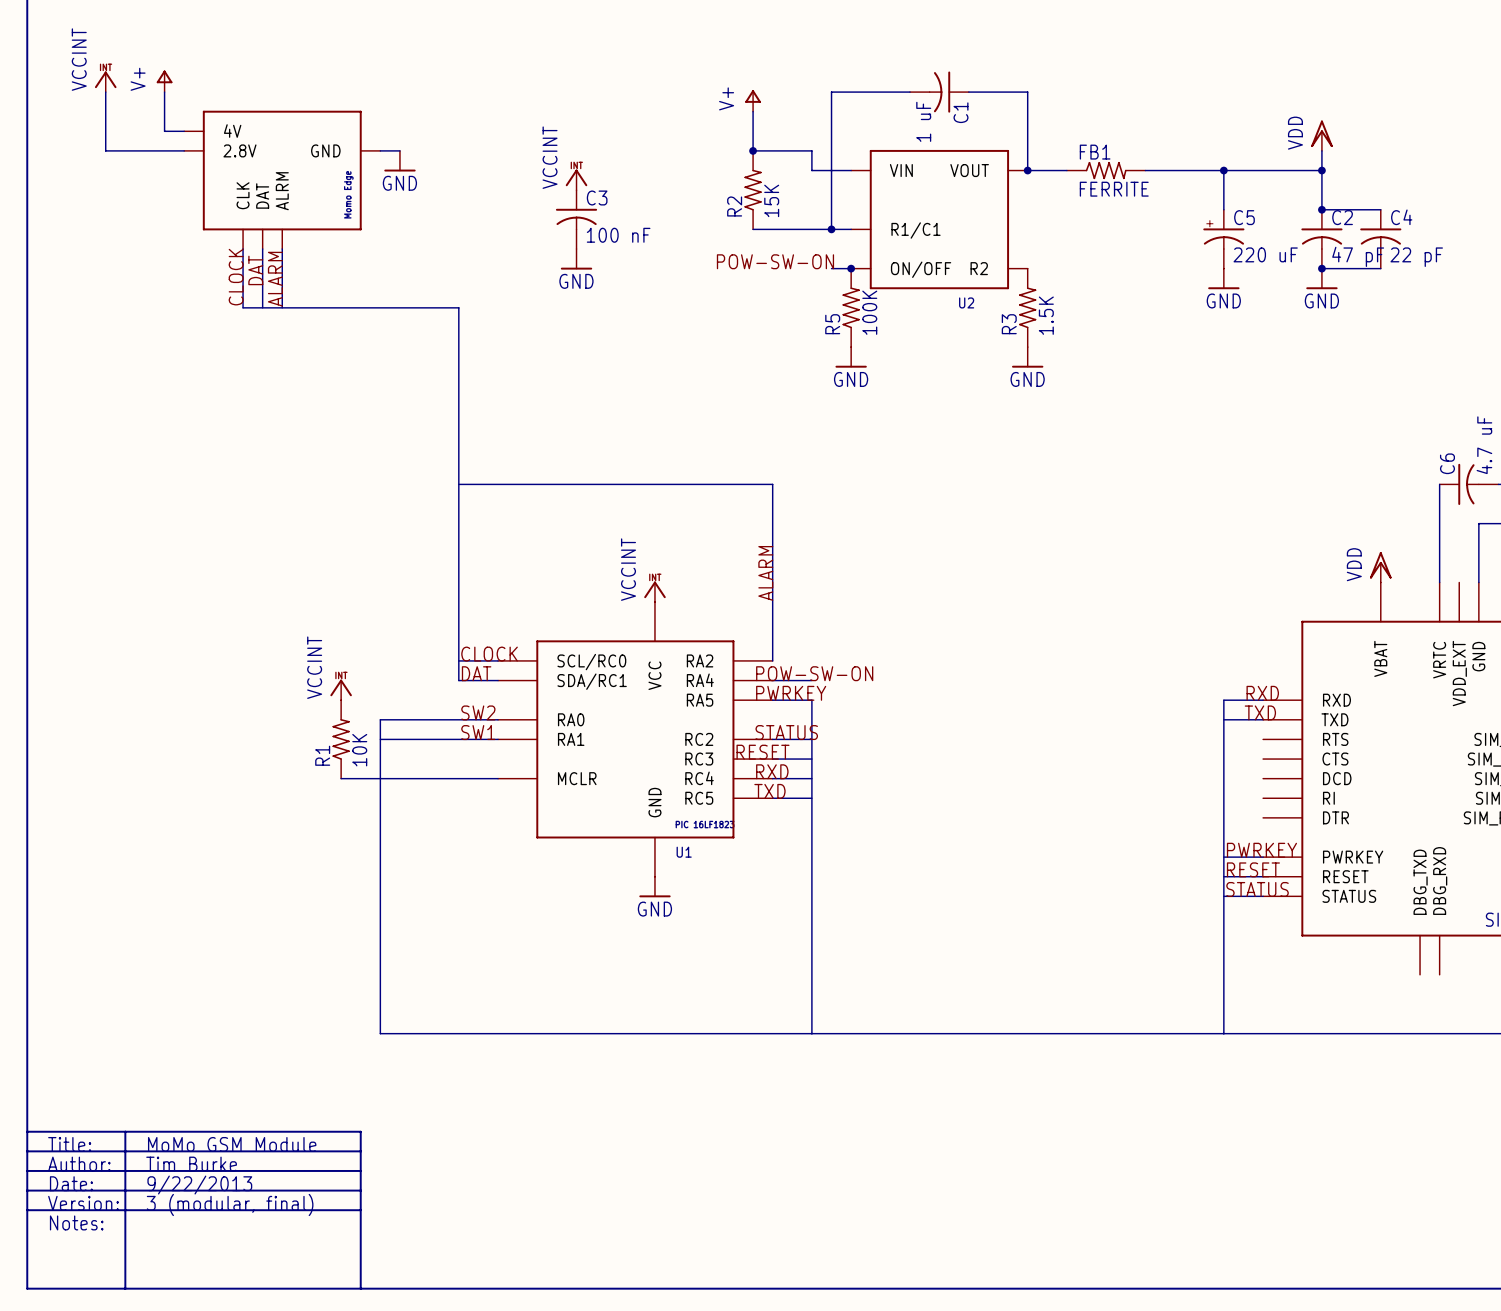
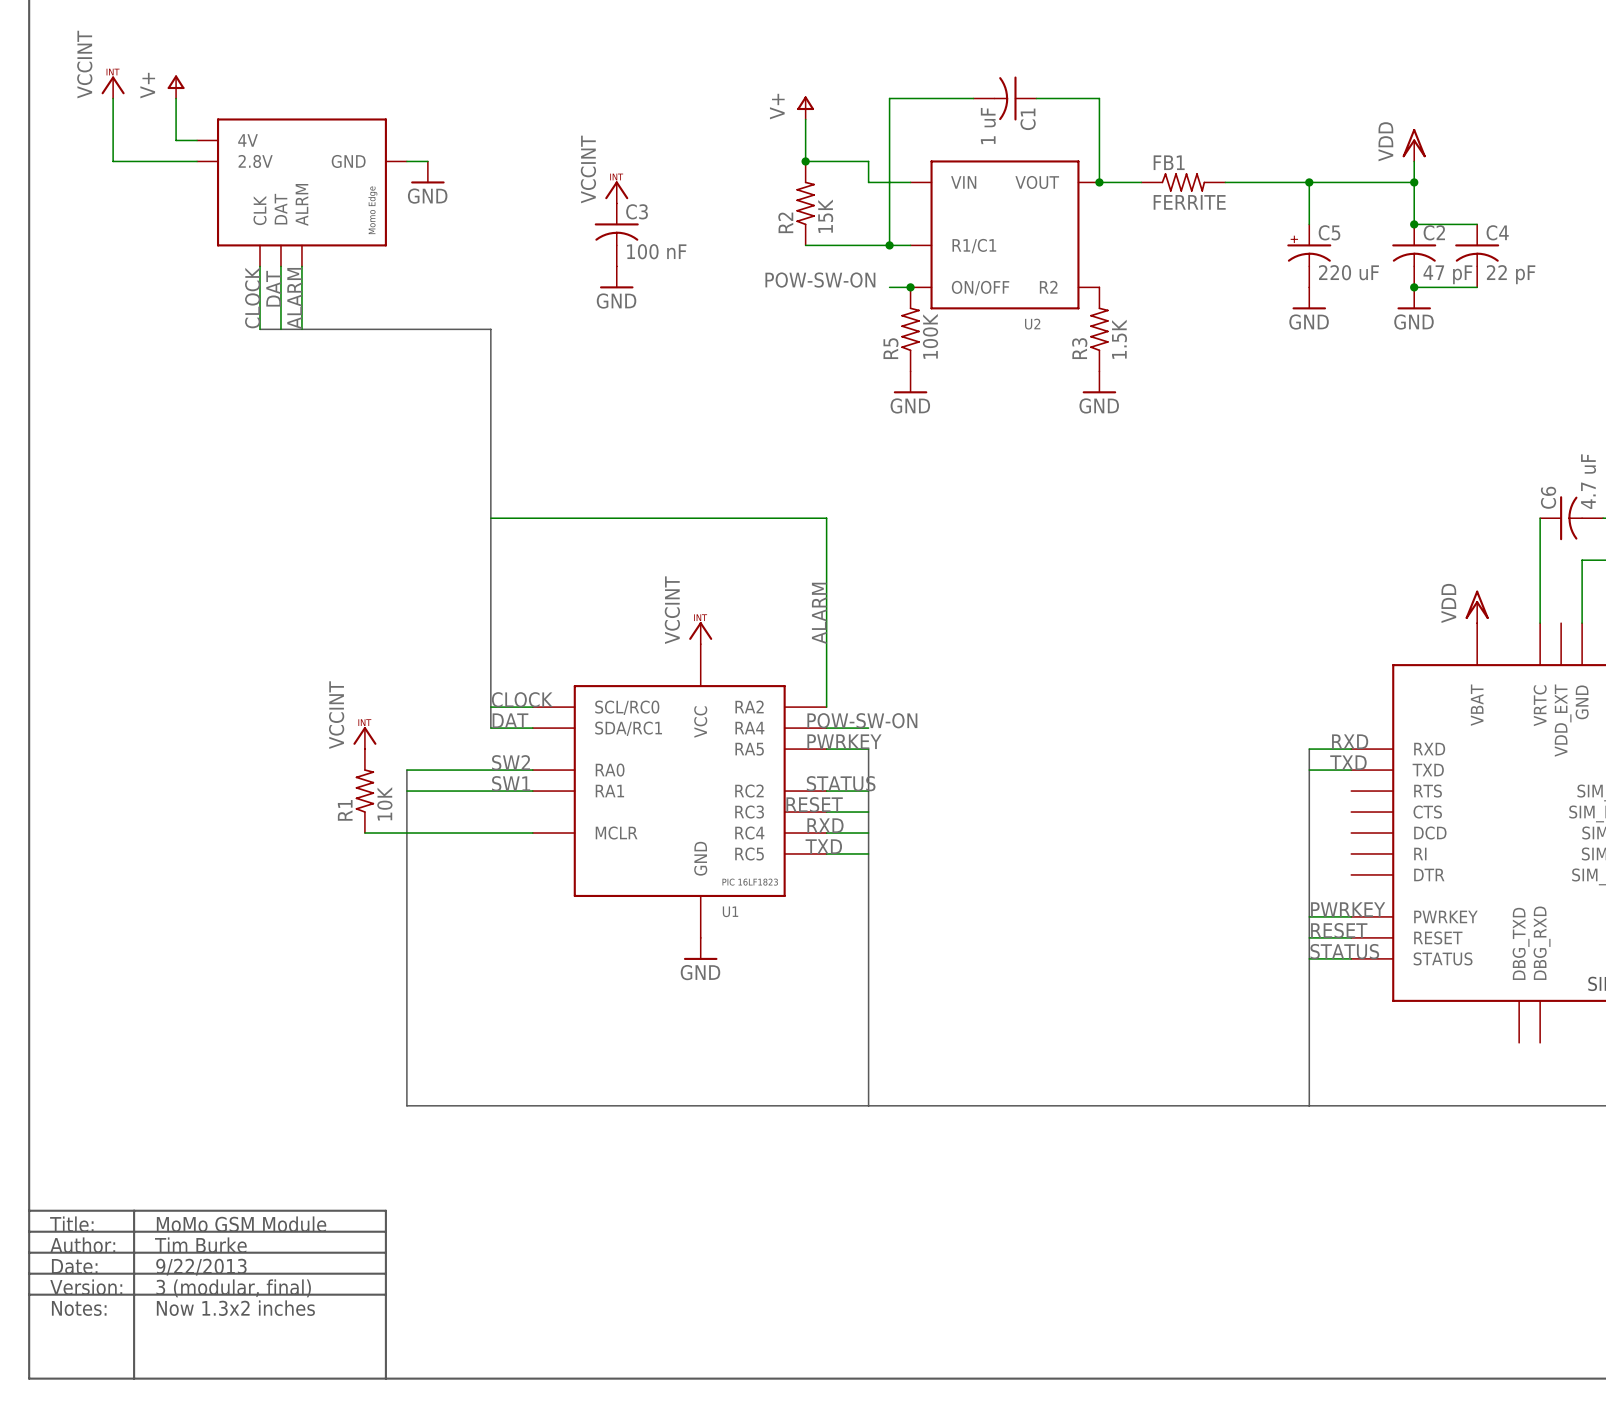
text: none -> Now 1.3x2 inches (235, 1308)

